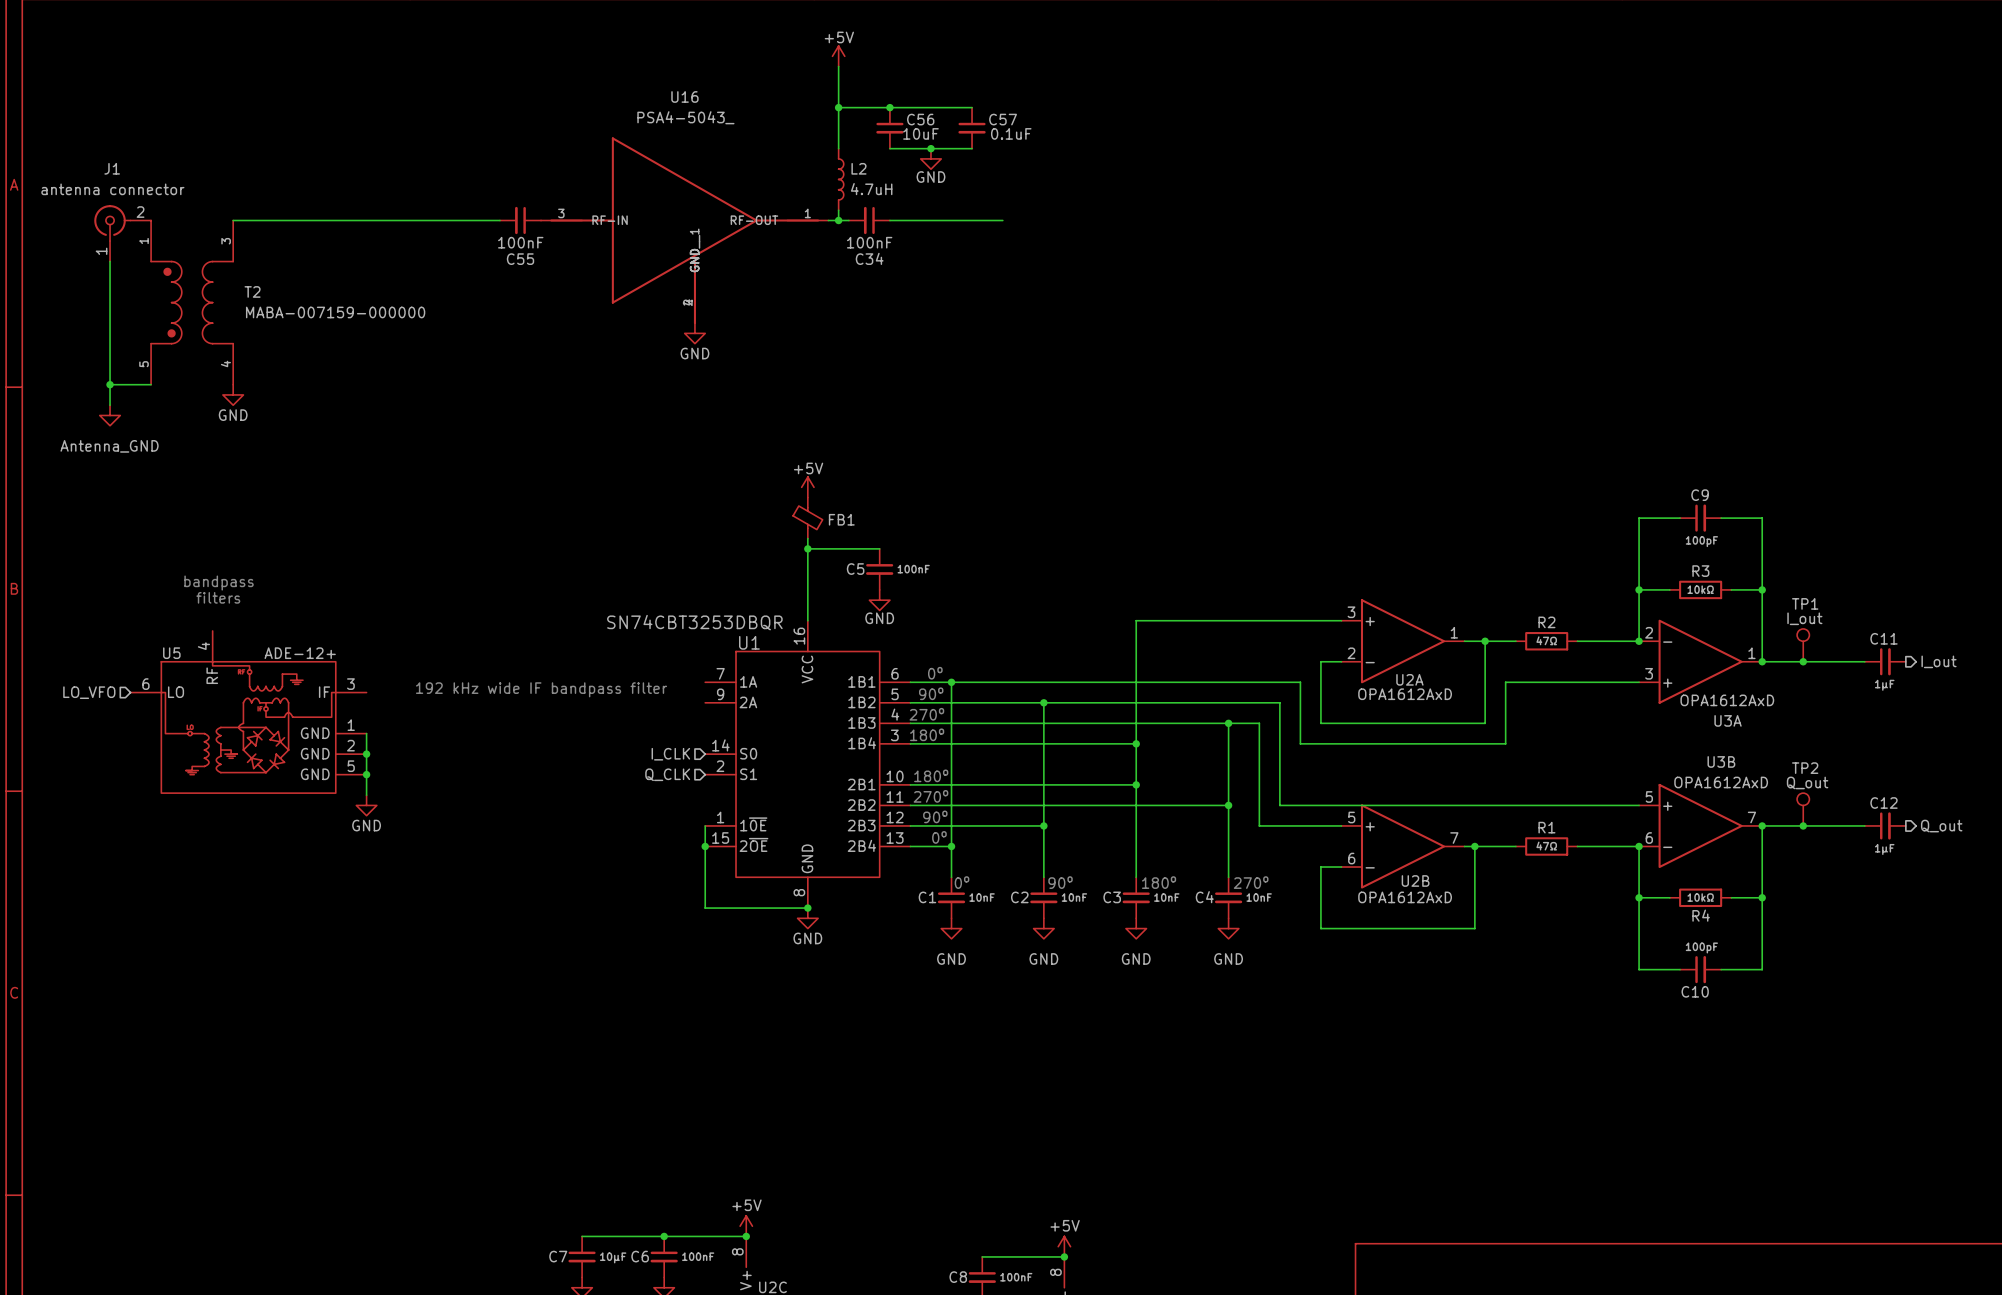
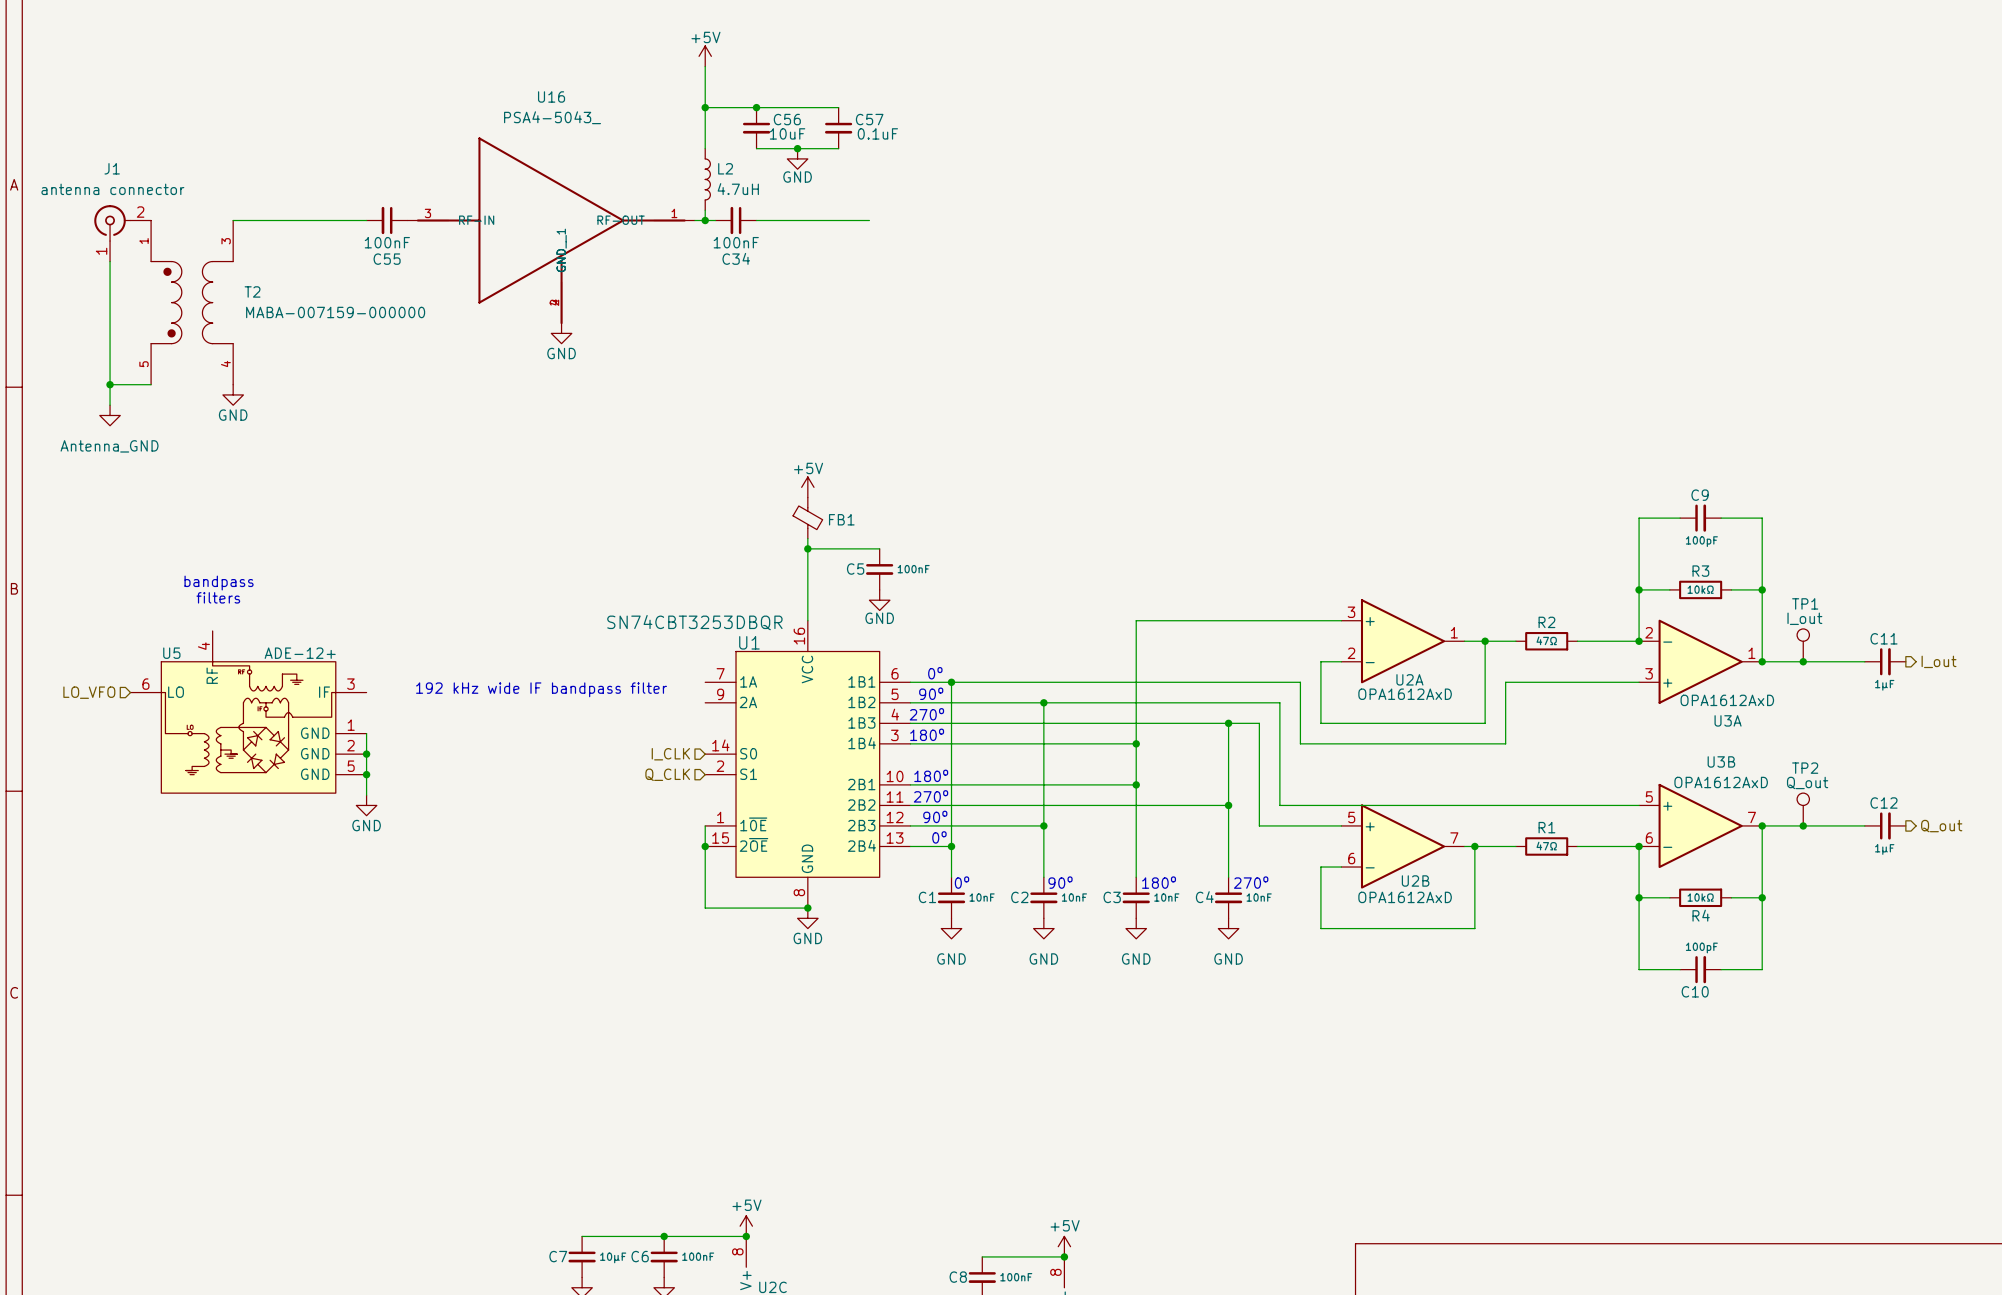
power symbol position: +5V (838, 56) -> +5V (705, 56)
wire: none -> (705, 66) (705, 148)
wire: (838, 66) (838, 148) -> (756, 148) (838, 148)
junction: none -> (705, 107)
junction: none -> (756, 107)
wire: (838, 107) (972, 107) -> (838, 107) (705, 107)
junction: (838, 107) -> none
junction: (889, 107) -> none
C56 position: (889, 128) -> (756, 128)
C57 position: (972, 128) -> (838, 128)
junction: none -> (797, 148)
wire: (889, 148) (972, 148) -> none
junction: (930, 148) -> none
power symbol: none -> GND (797, 158)
power symbol: GND (930, 158) -> none
L2 position: (841, 179) -> (707, 179)
wire: (838, 210) (838, 220) -> (705, 210) (705, 220)
C55 position: (520, 220) -> (387, 220)
wire: none -> (694, 220) (715, 220)
junction: none -> (705, 220)
junction: (838, 220) -> none
C34 position: (869, 220) -> (736, 220)
wire: (889, 220) (1002, 220) -> none
U16 position: (684, 230) -> (551, 230)
power symbol: none -> GND (561, 333)
power symbol: GND (694, 333) -> none

